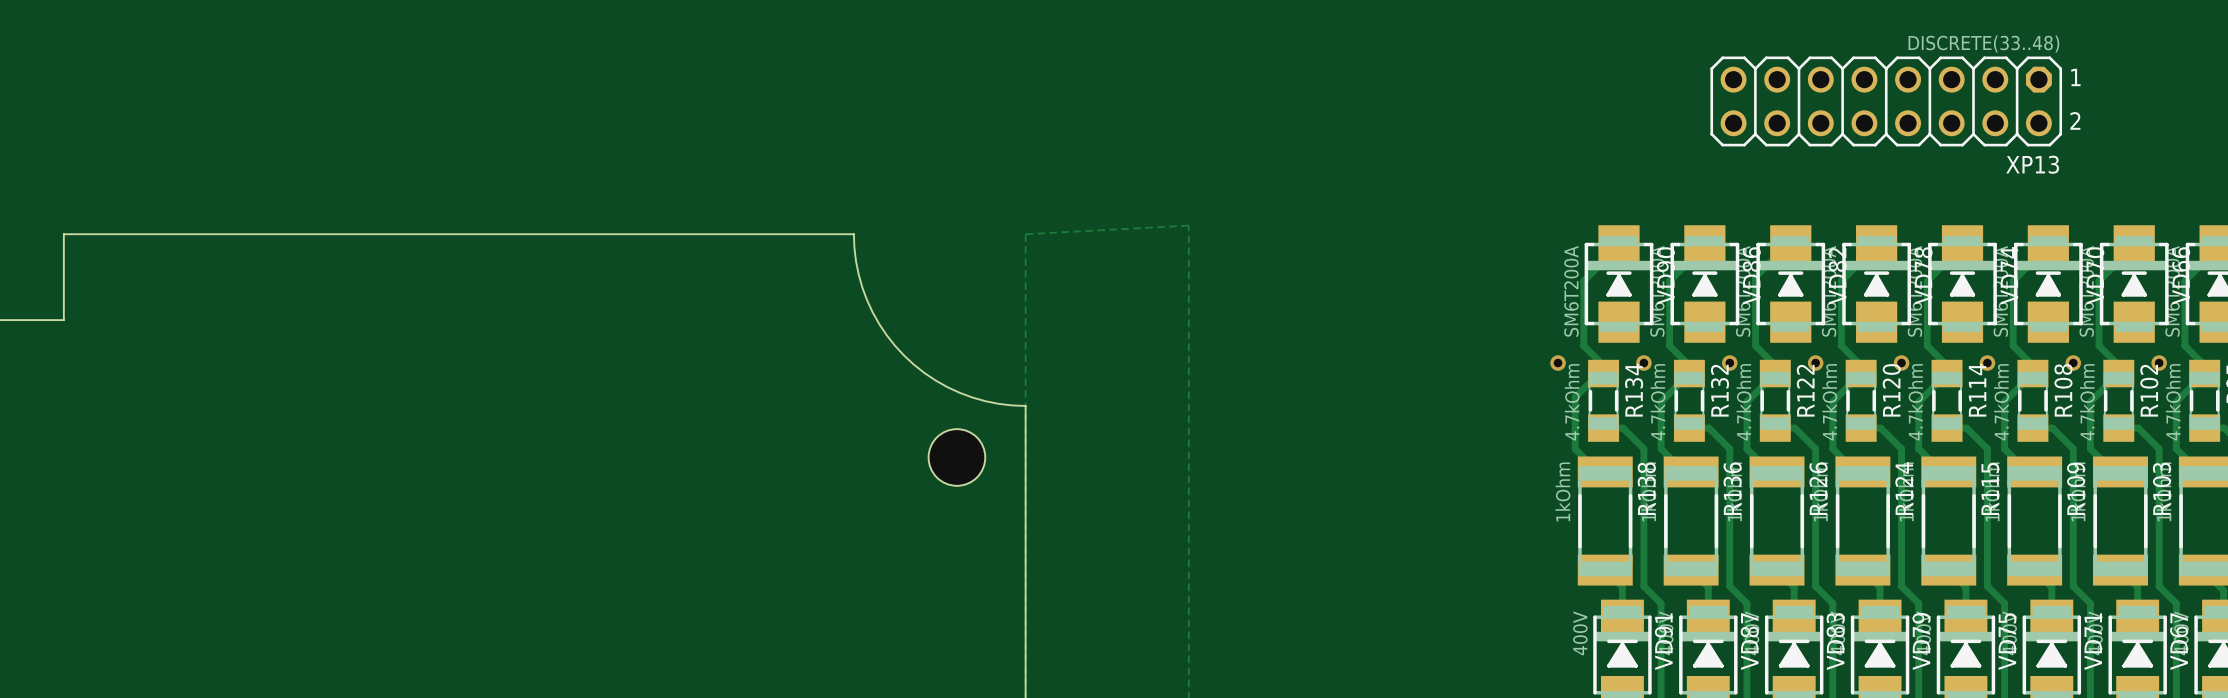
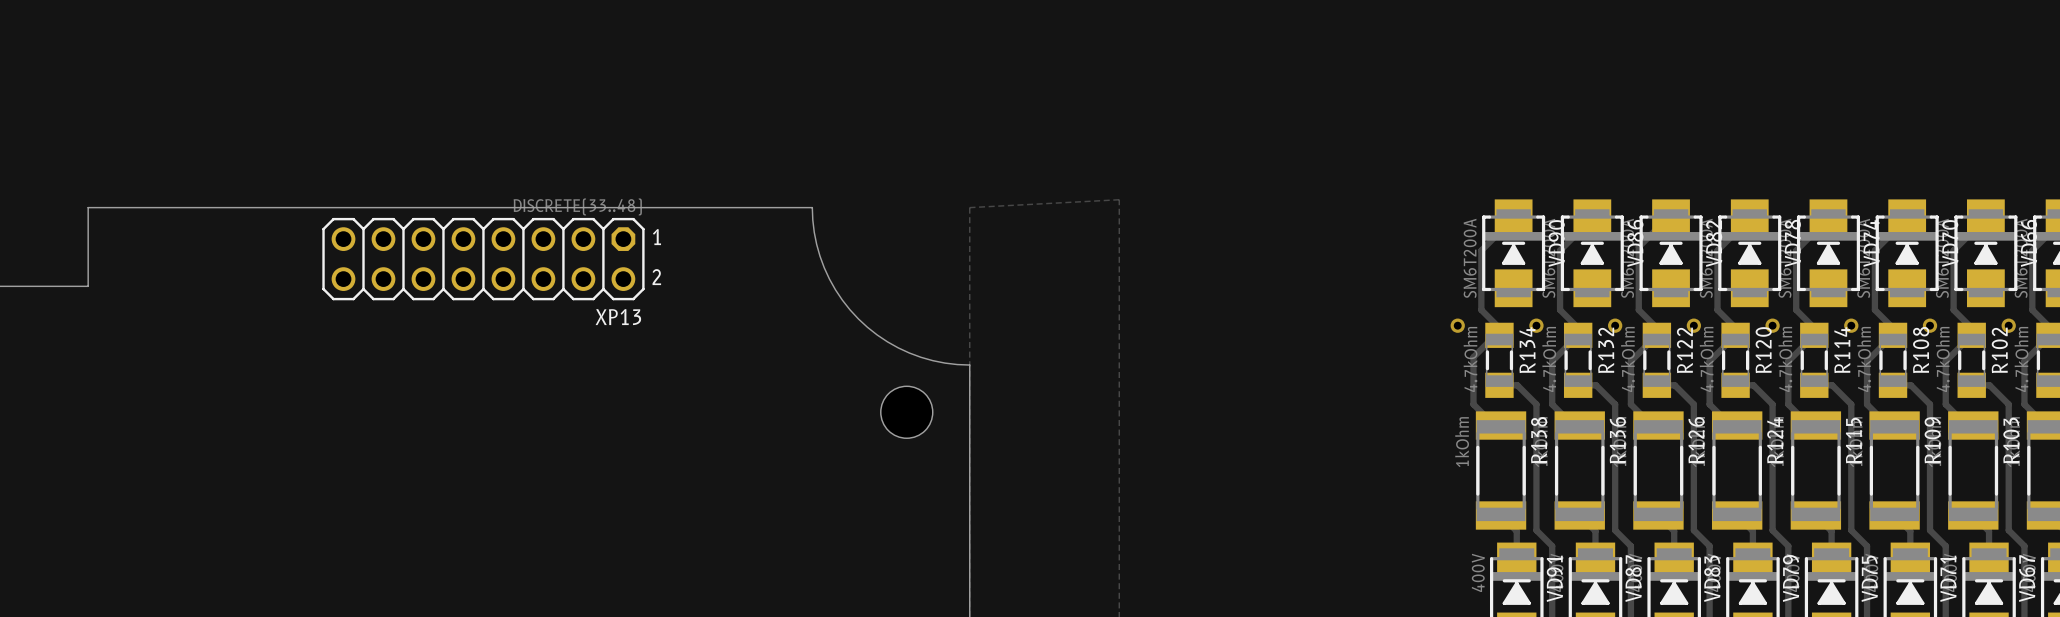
XP13 position: (1886, 101) -> (483, 259)

